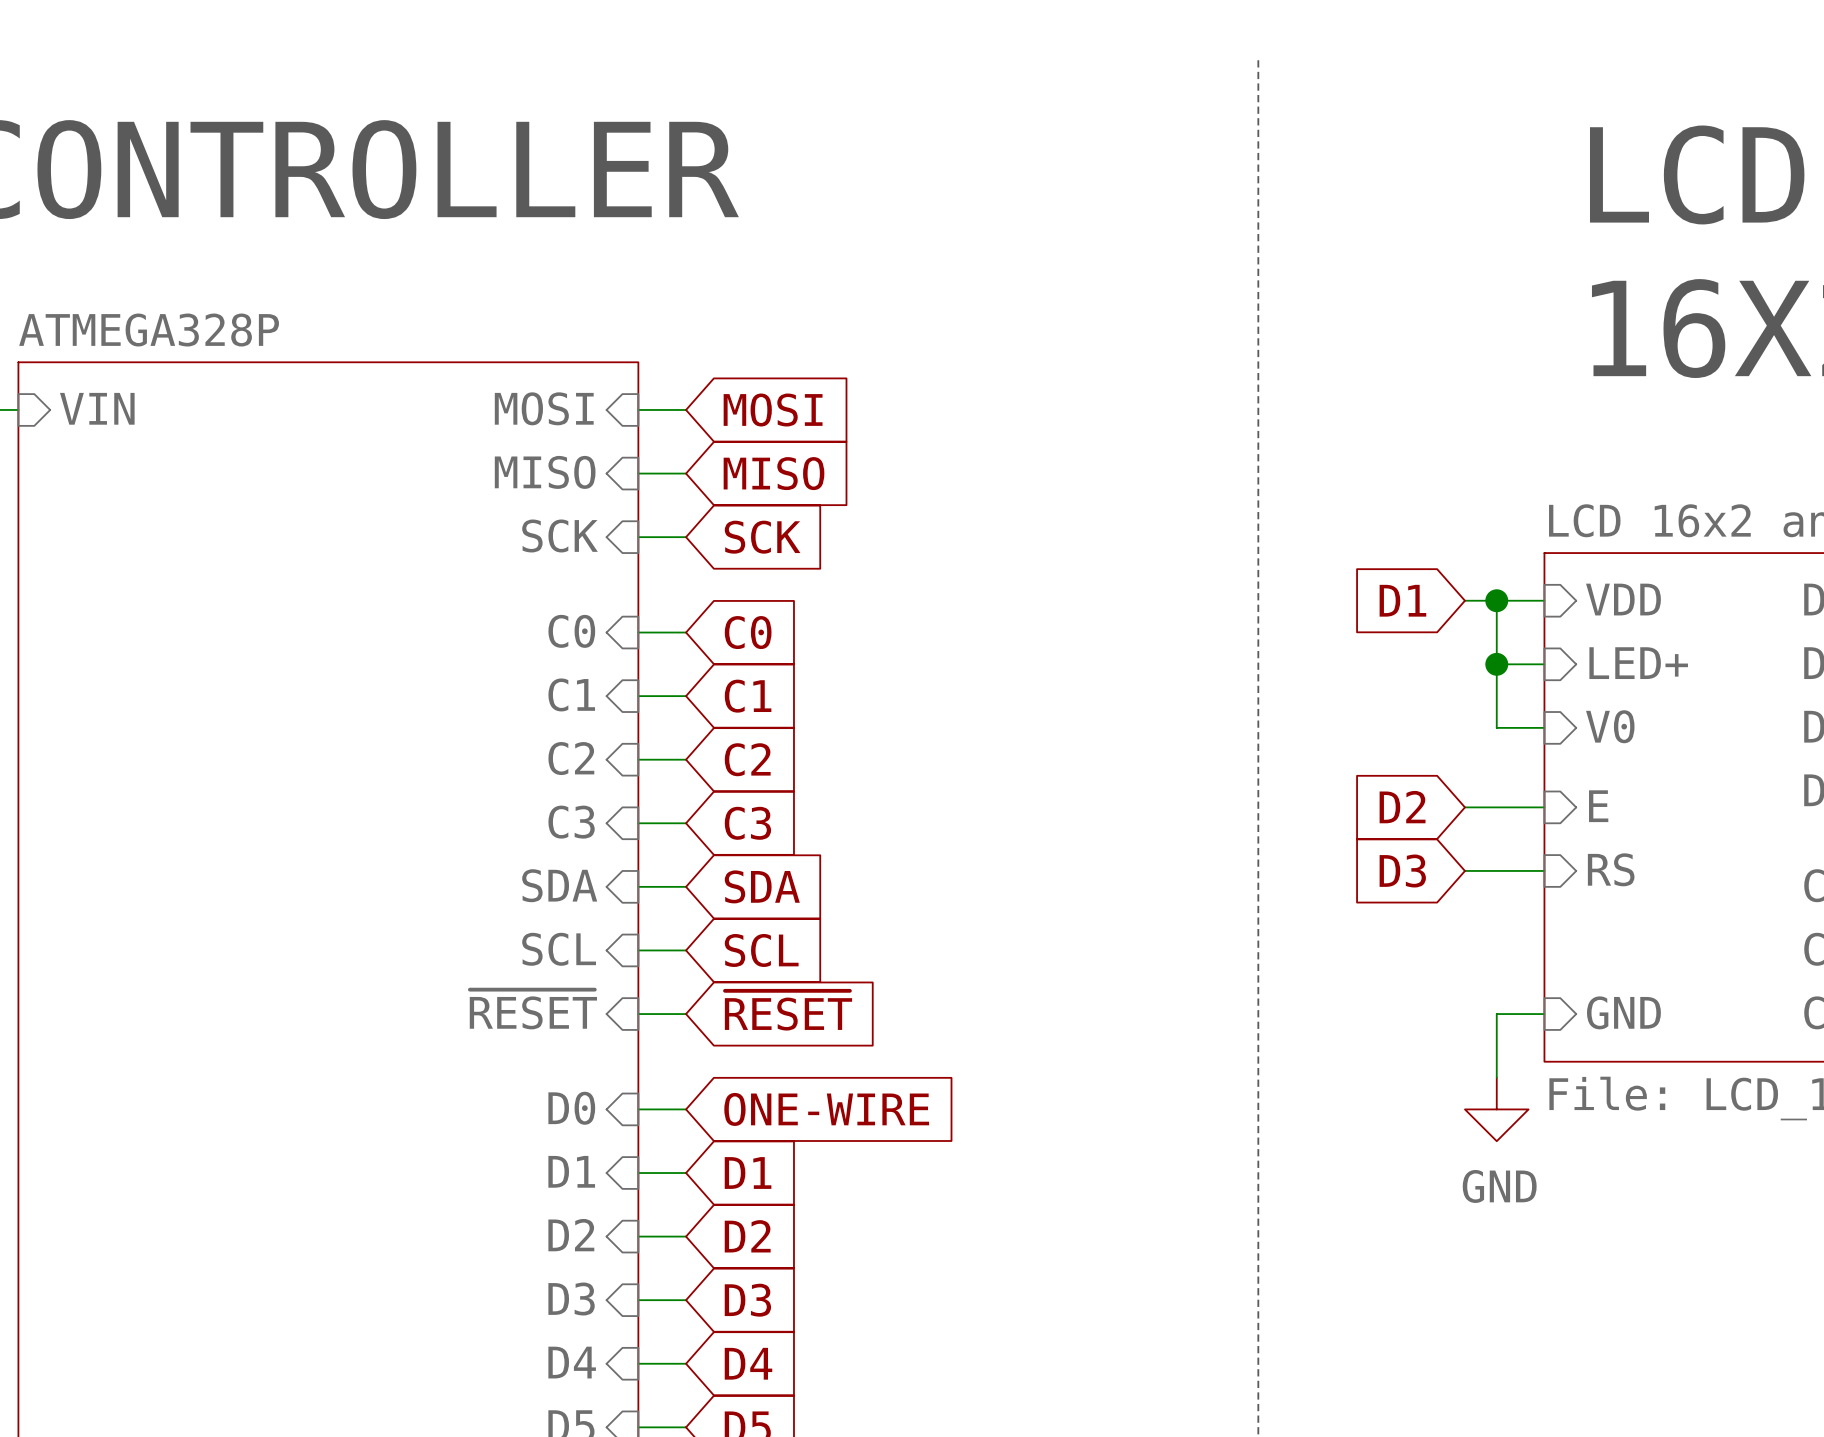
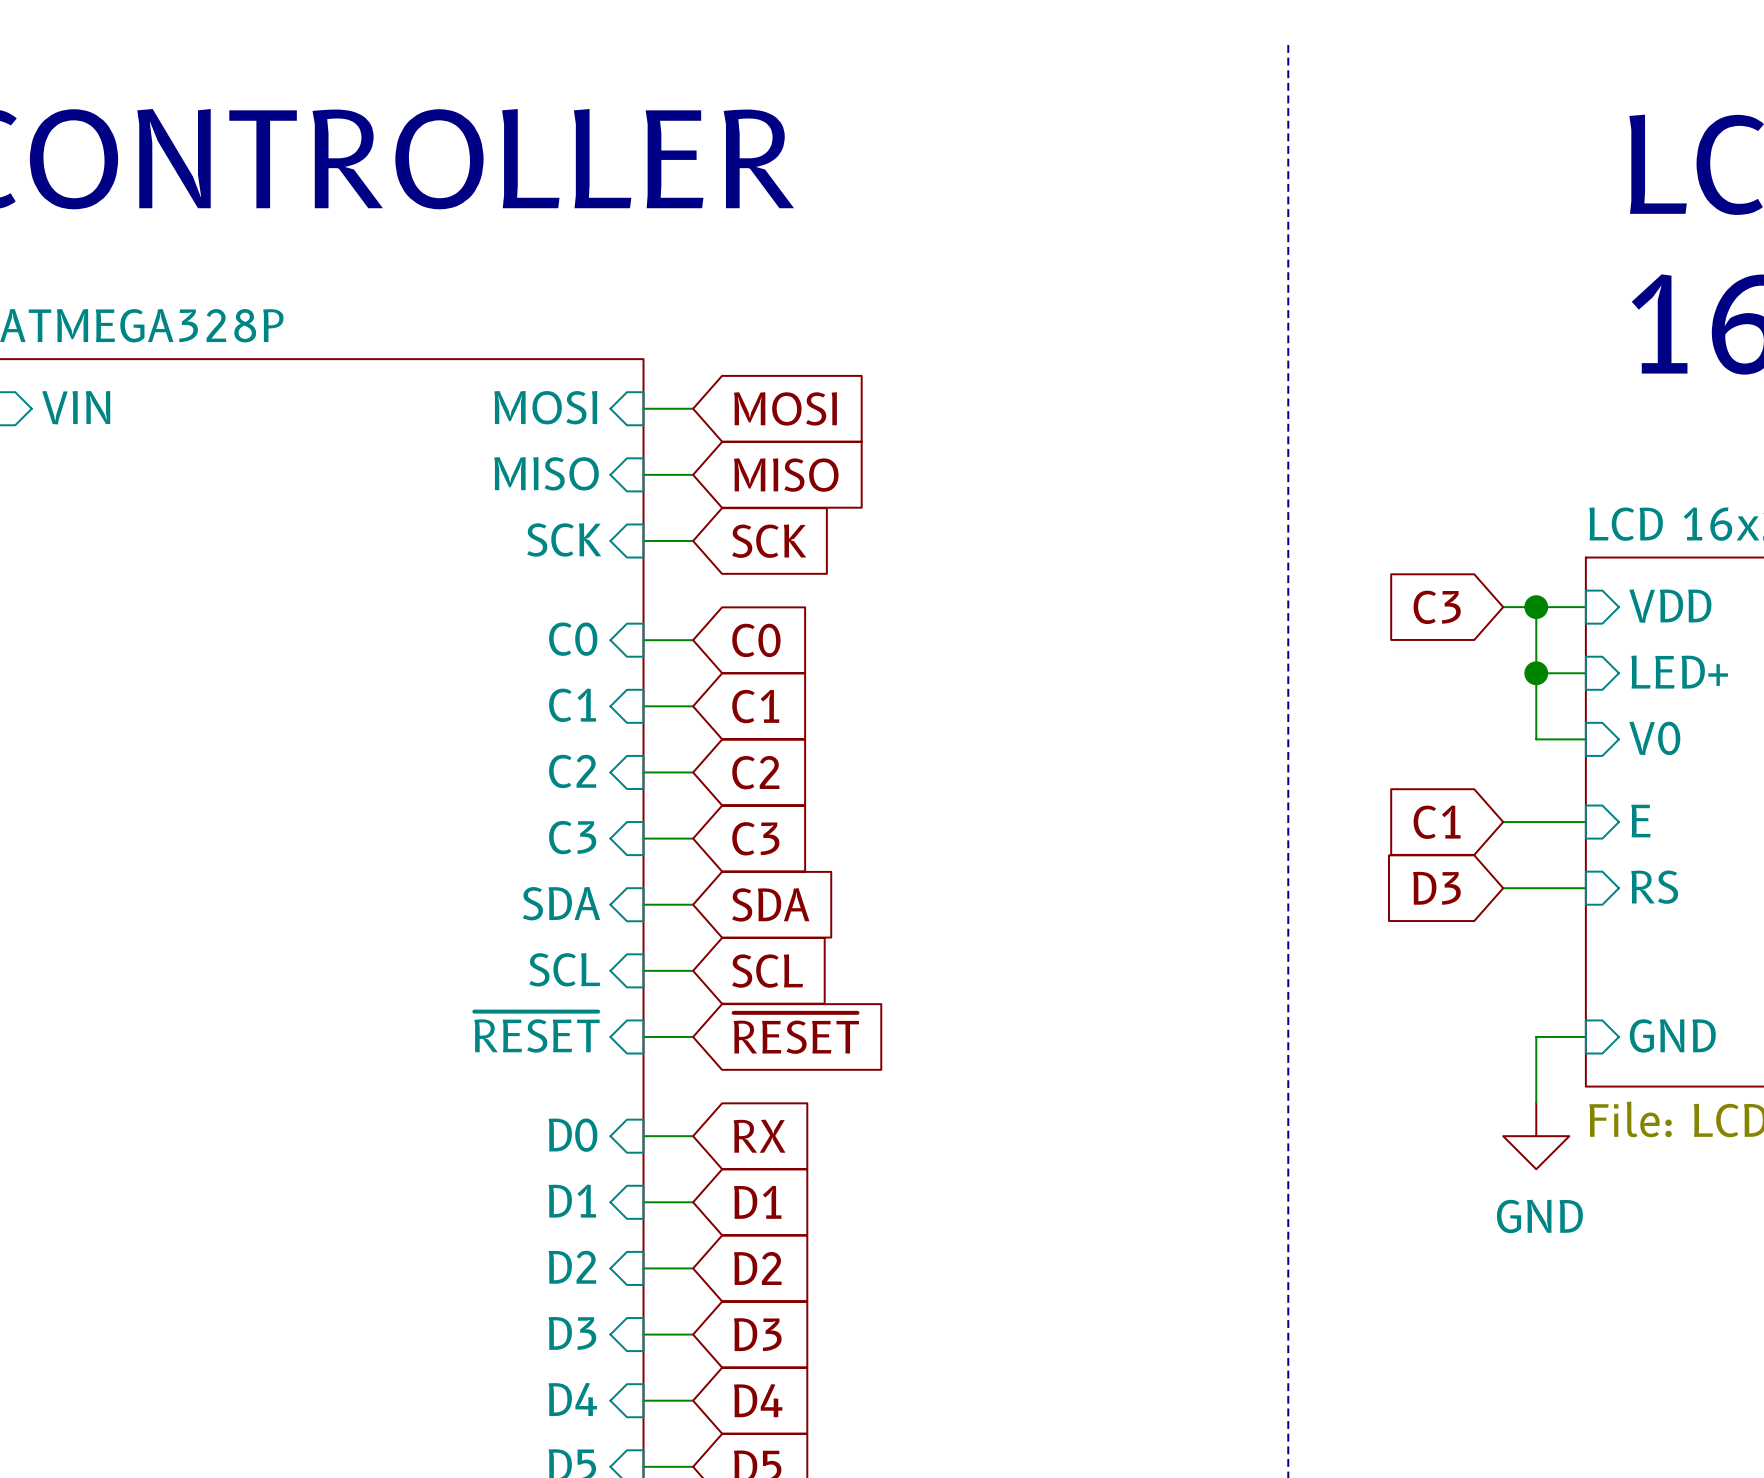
global label: D1 (1402, 600) -> C3 (1437, 607)
global label: D2 (1402, 807) -> C1 (1437, 822)
global label: ONE-WIRE (826, 1109) -> RX (759, 1136)

